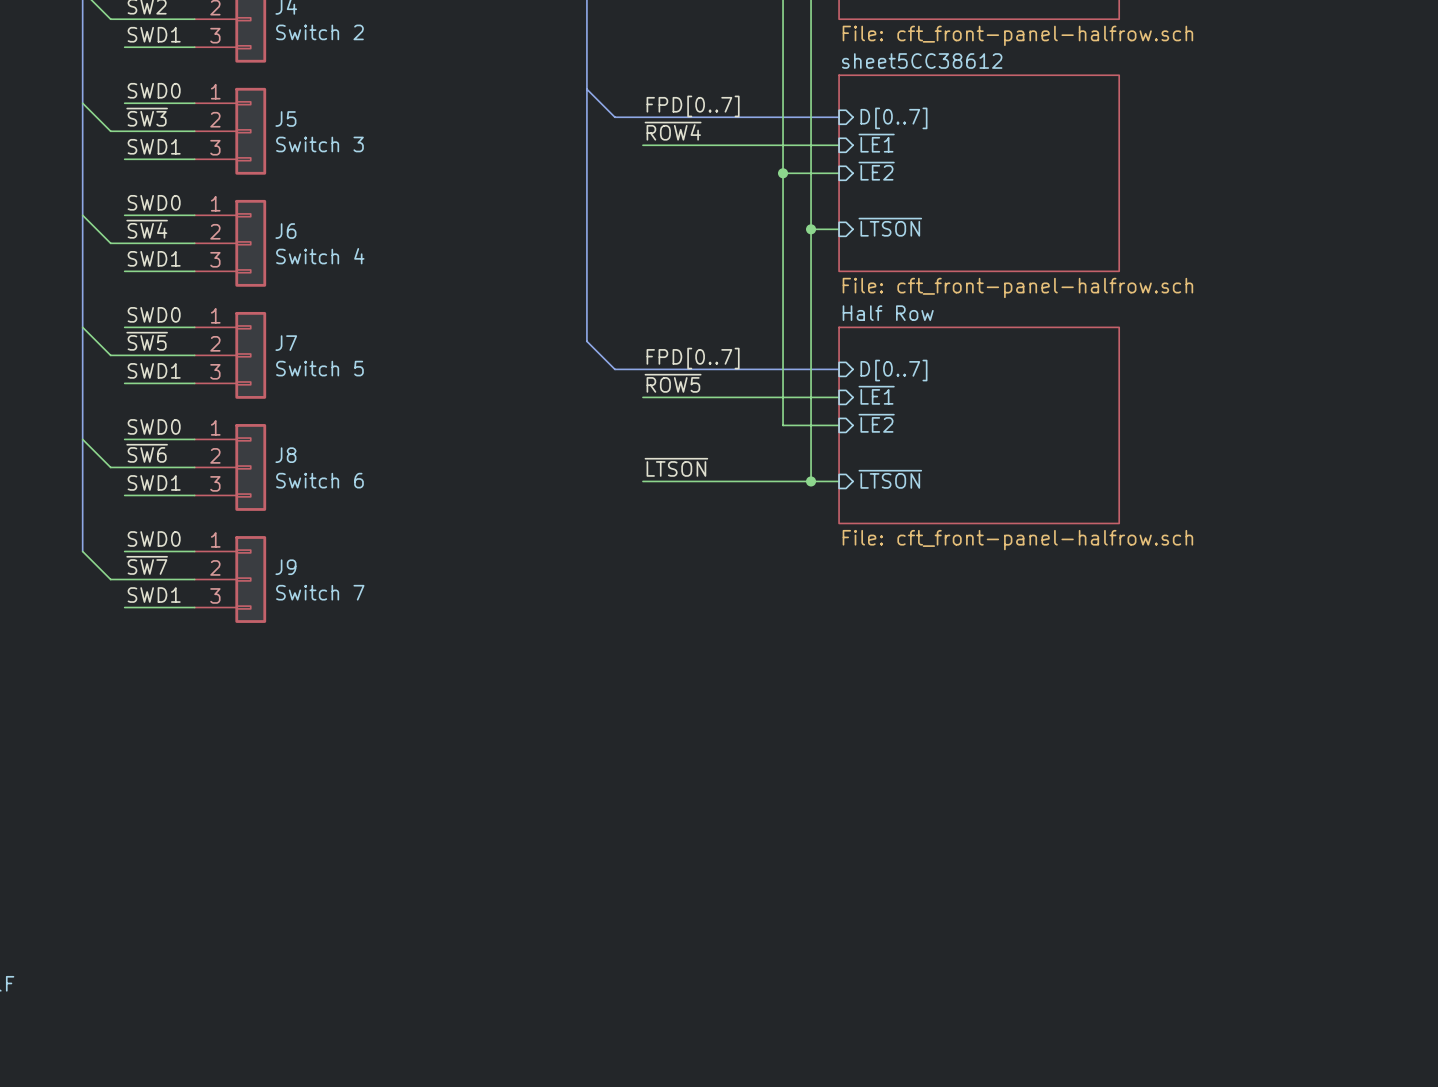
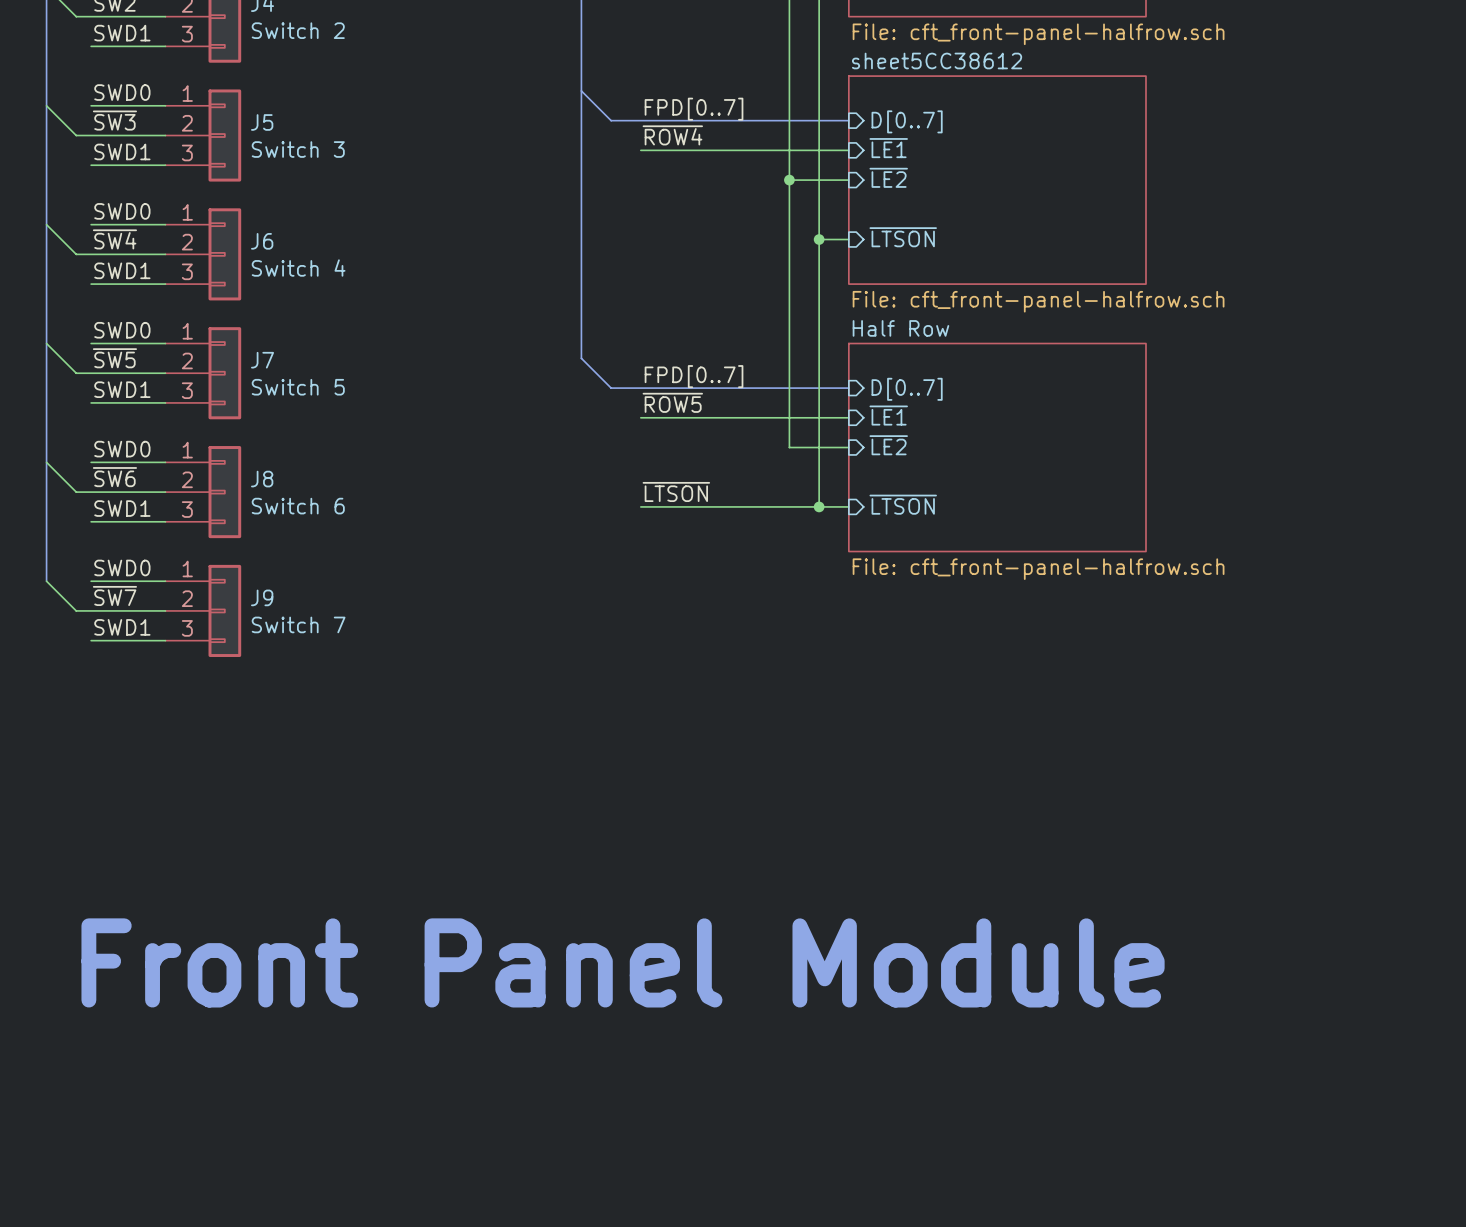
text: none -> Front Panel Module (623, 962)

